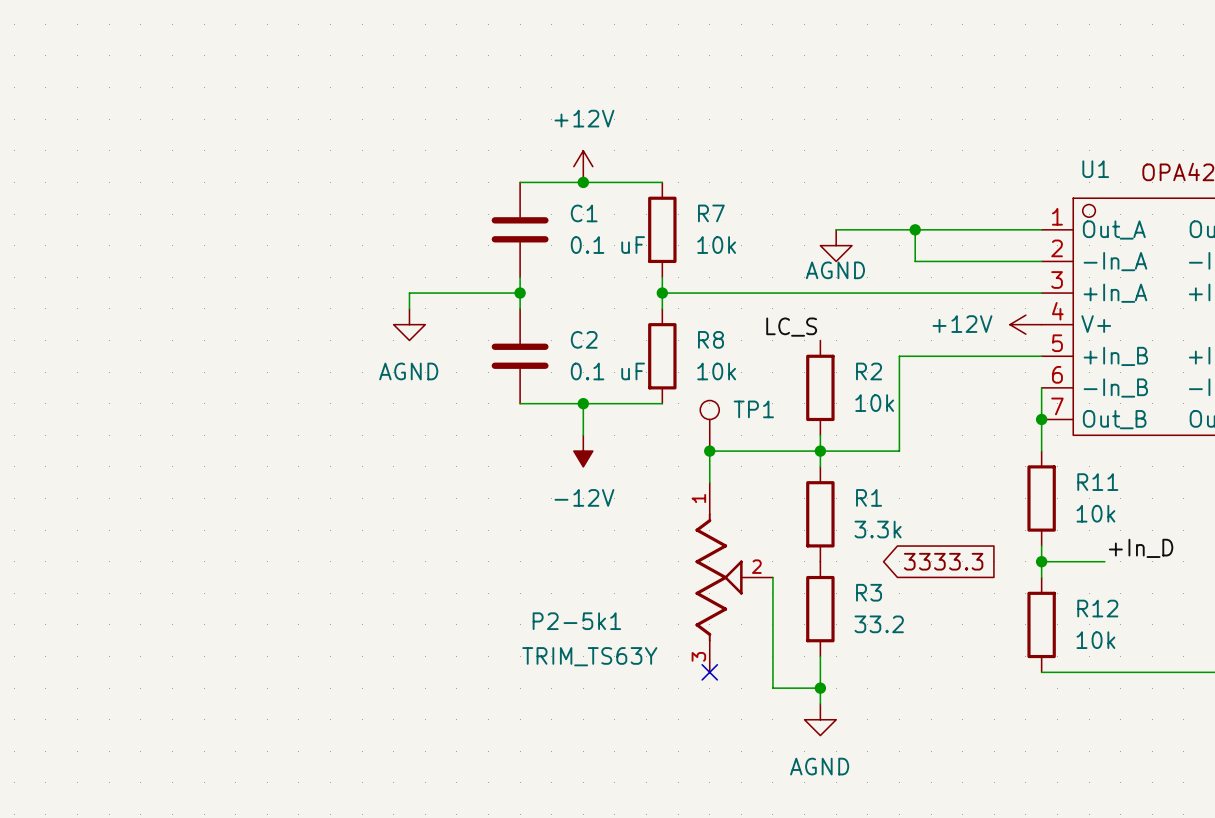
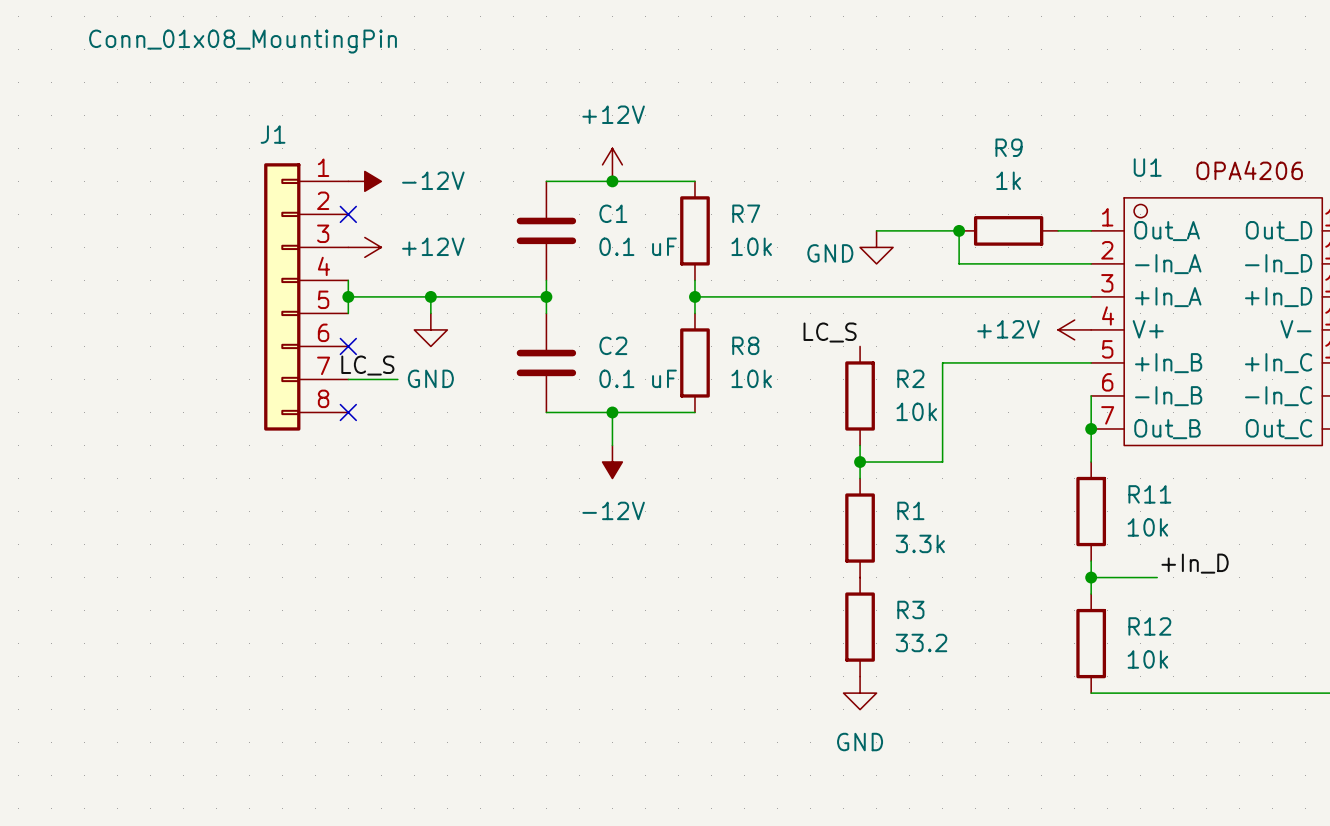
power symbol: none -> -12V (364, 181)
no-connect mark: none -> (348, 214)
wire: (915, 229) (1010, 229) -> none
R9: none -> 1k (1008, 230)
power symbol: none -> +12V (364, 247)
power symbol: AGND (836, 245) -> GND (876, 247)
wire: none -> (348, 280) (348, 313)
J1: none -> Conn_01x08_MountingPin (306, 296)
wire: none -> (348, 296) (430, 296)
junction: none -> (348, 296)
junction: none -> (430, 296)
power symbol: AGND (409, 324) -> GND (430, 329)
no-connect mark: none -> (348, 346)
label: none -> LC_S (367, 365)
wire: none -> (348, 379) (397, 379)
no-connect mark: none -> (348, 412)
TP1: (709, 425) -> none
junction: (709, 451) -> none
wire: (820, 451) (709, 451) (709, 482) -> none
global label: 3333.3 (943, 561) -> none
P2-5k1: TRIM_TS63Y (734, 577) -> none
wire: (772, 577) (772, 688) (820, 688) -> none
wire: (820, 656) (820, 703) -> none
no-connect mark: (709, 672) -> none
power symbol: none -> GND (860, 693)
junction: (820, 688) -> none
power symbol: AGND (820, 719) -> none

